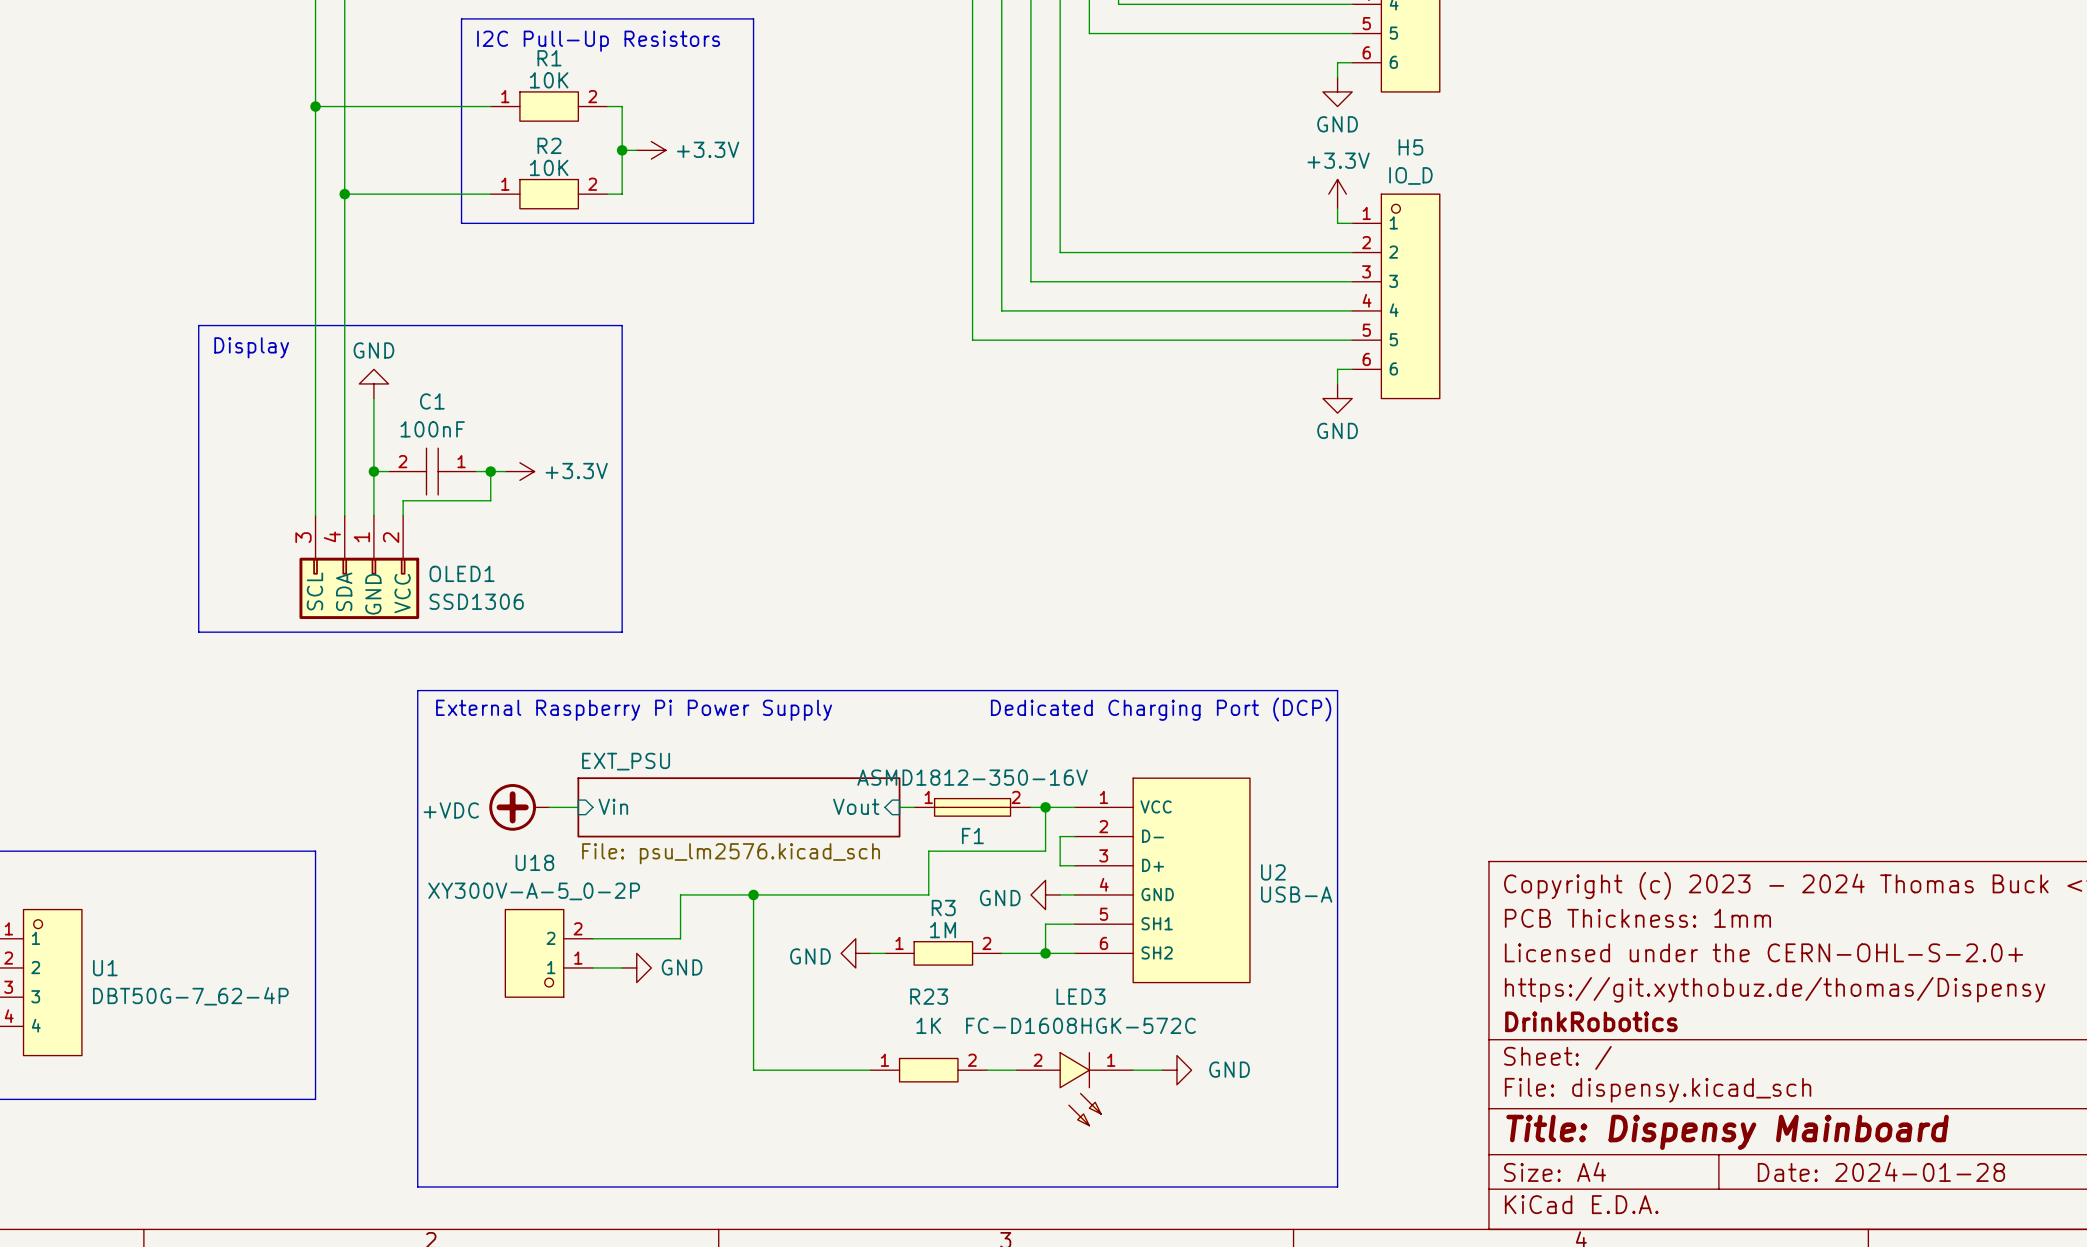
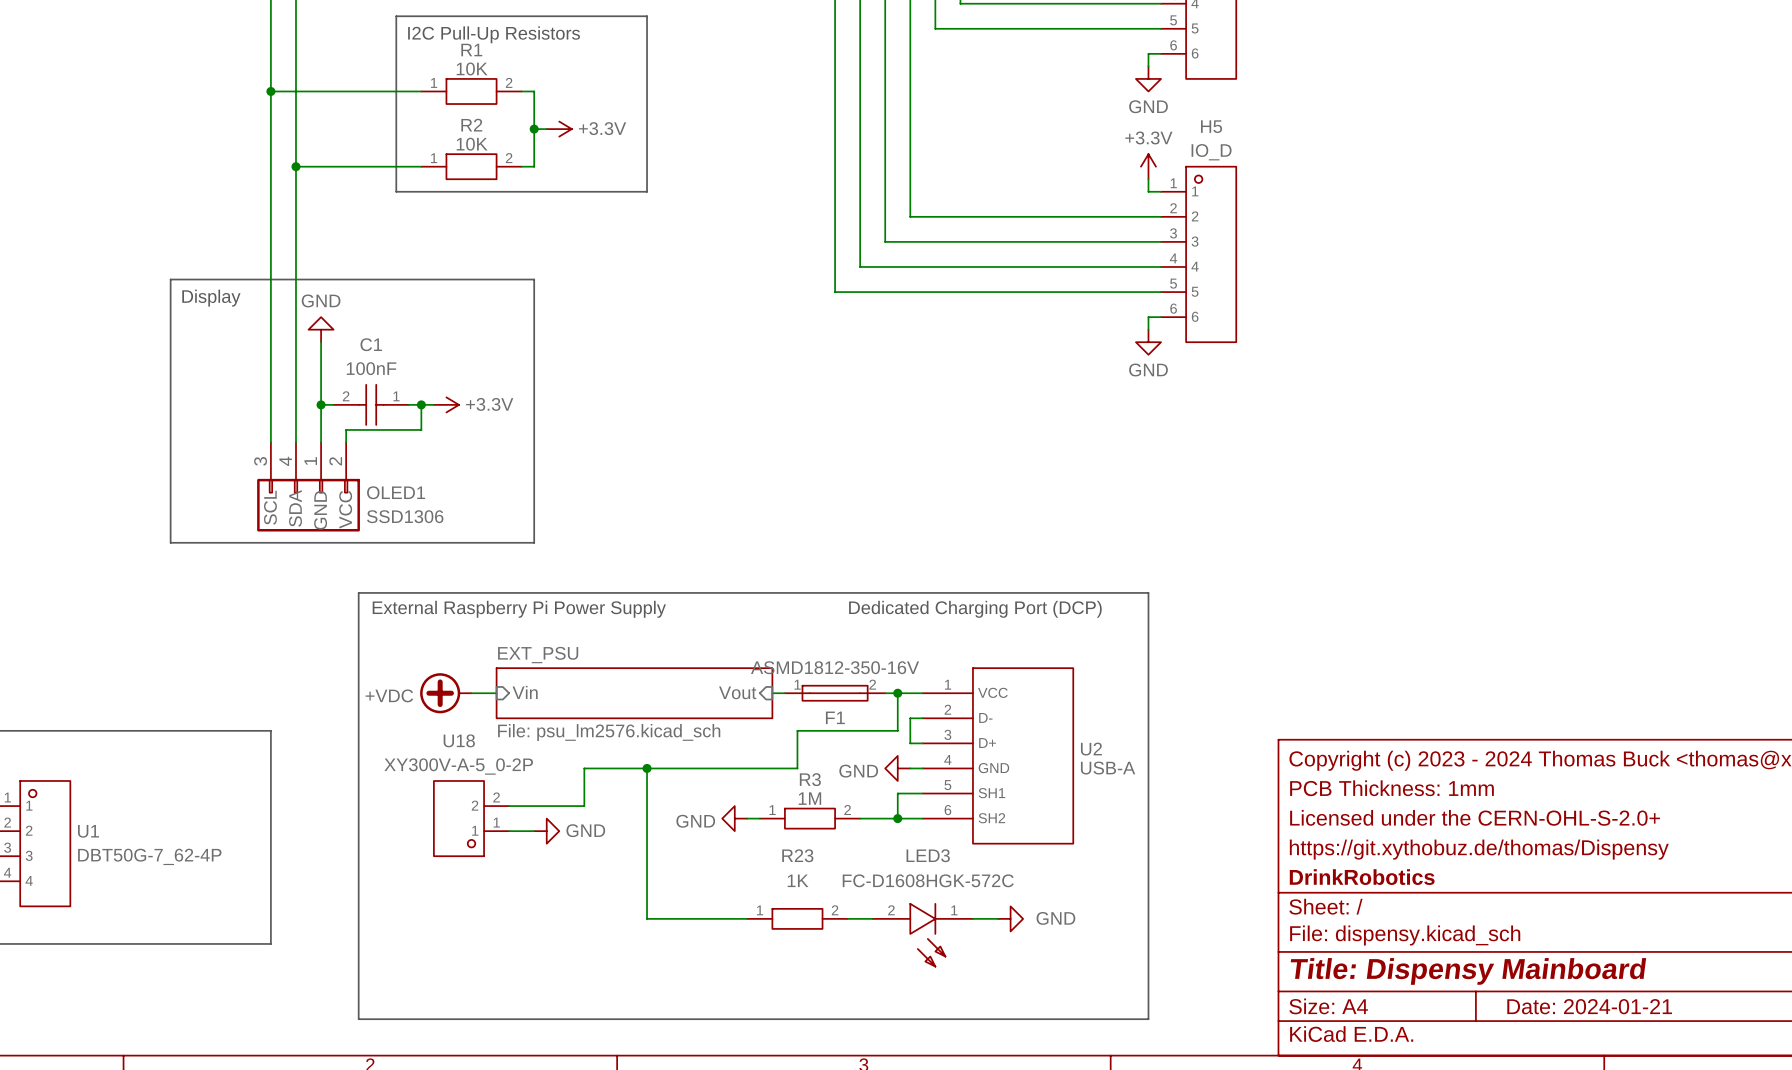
title block: Date: 2024-01-28 (1881, 1172) -> Date: 2024-01-21 (1589, 1006)

